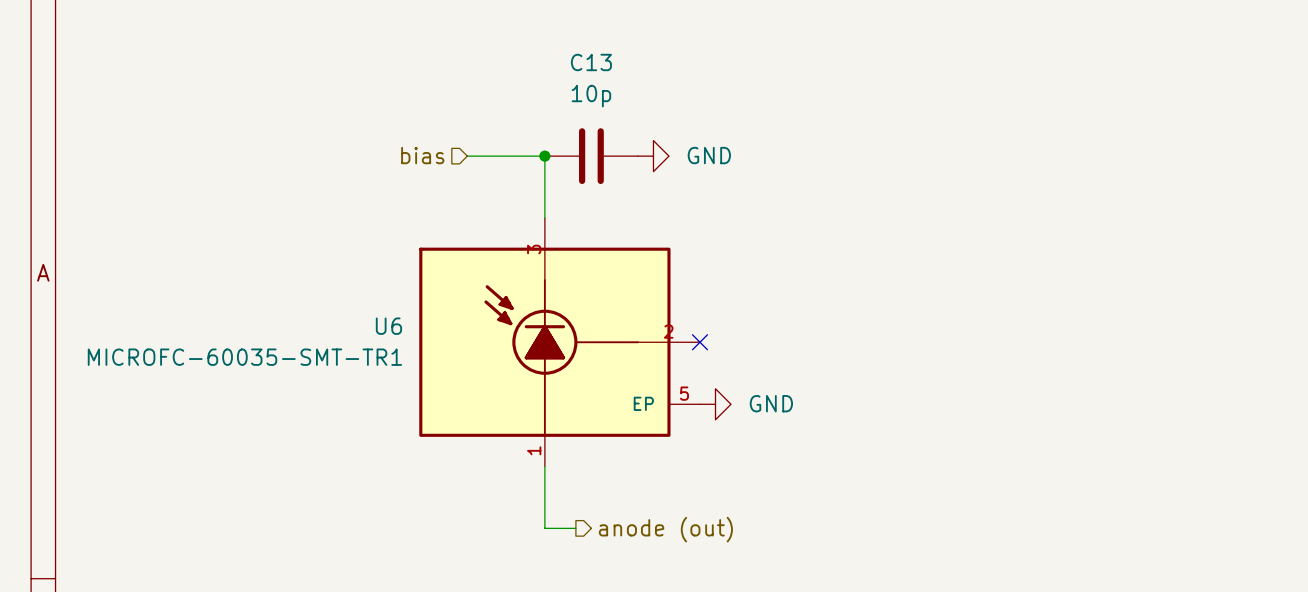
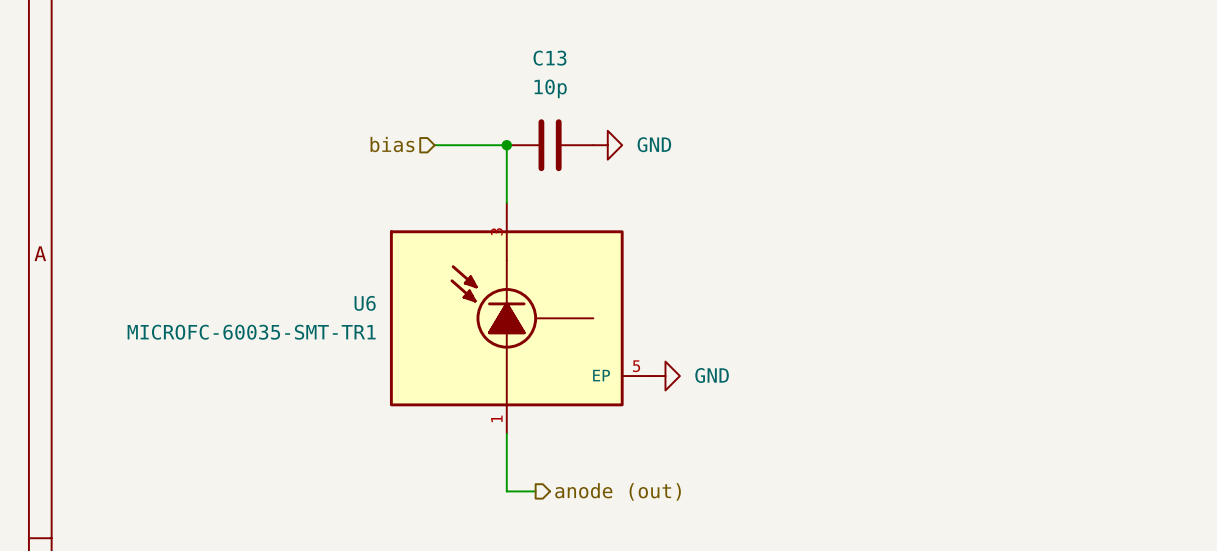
U6 symbol: [419, 218, 700, 467] -> [389, 202, 652, 434]
no-connect mark: (699, 342) -> none

